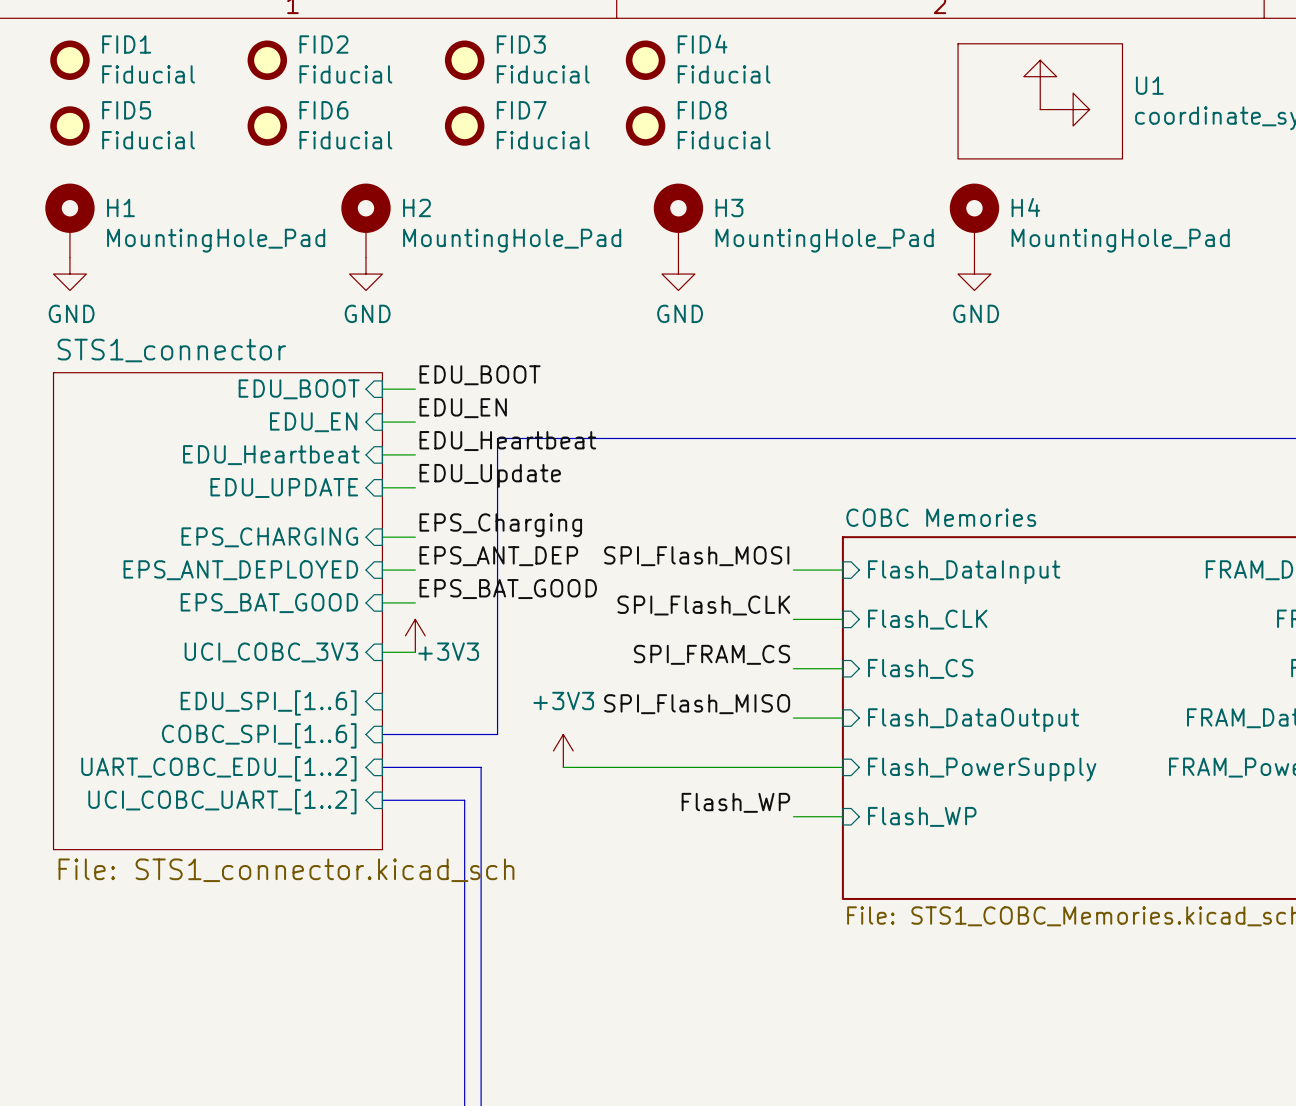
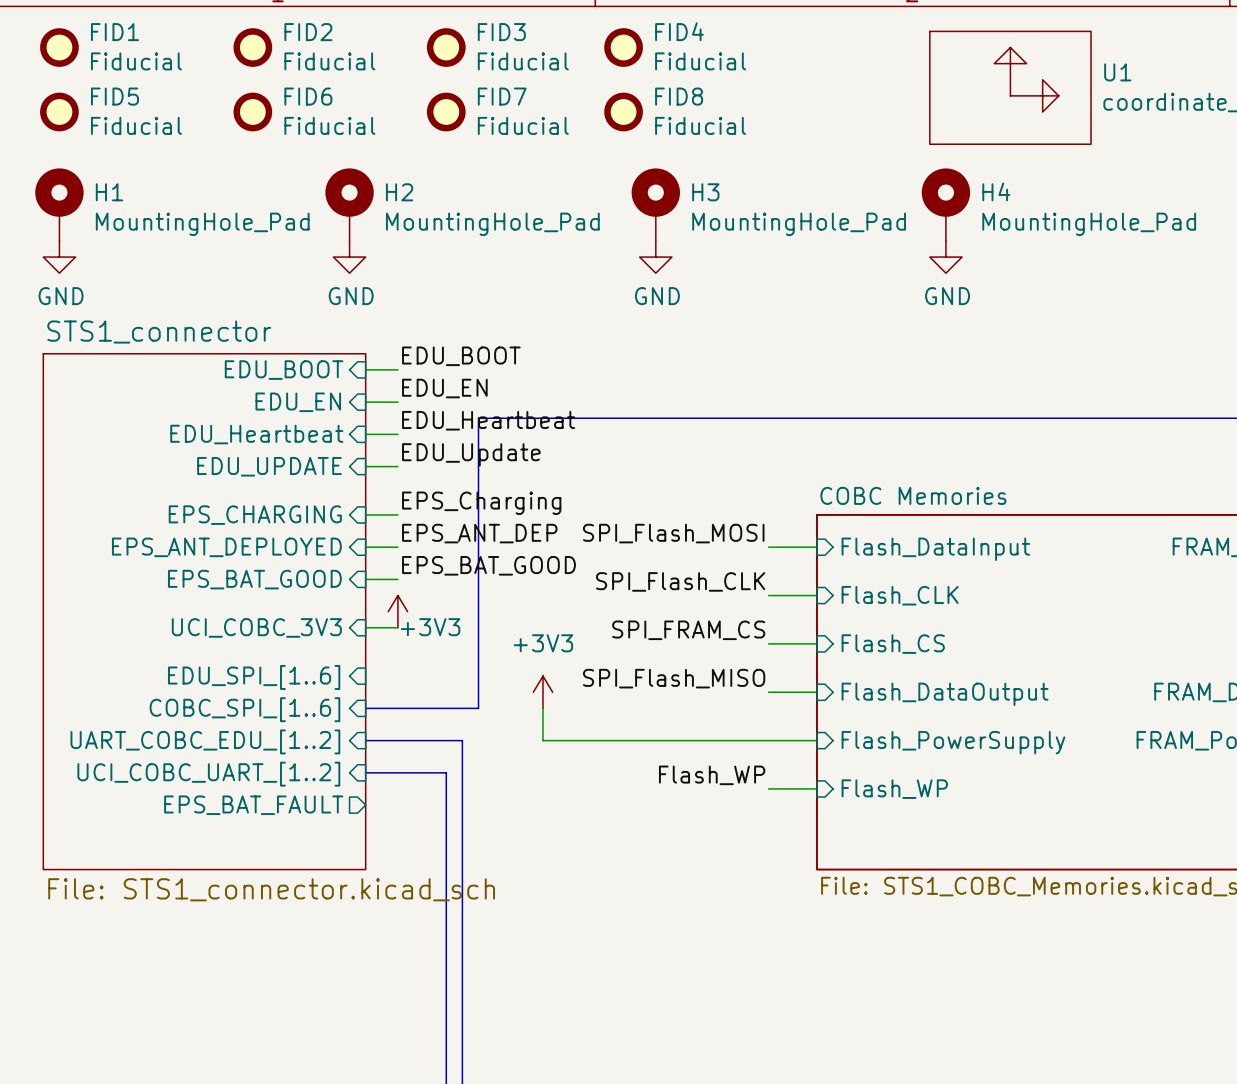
sheet STS1_connector shape: [53, 372, 383, 850] -> [43, 353, 366, 870]
power symbol position: +3V3 (563, 750) -> +3V3 (542, 692)
sheet pin: none -> EPS_BAT_FAULT (253, 805)

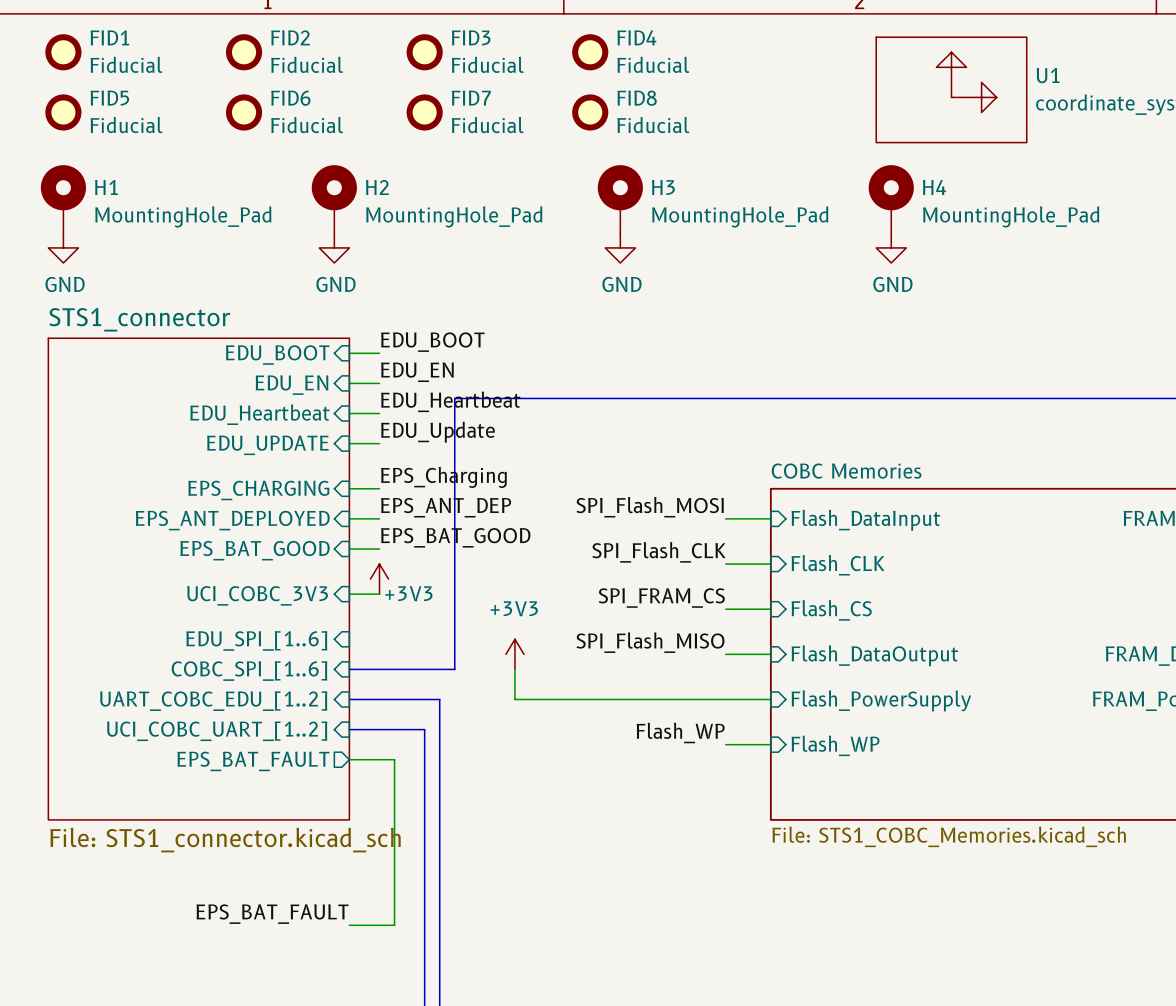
wire: none -> (349, 759) (394, 759) (394, 925) (349, 925)
label: none -> EPS_BAT_FAULT (272, 914)

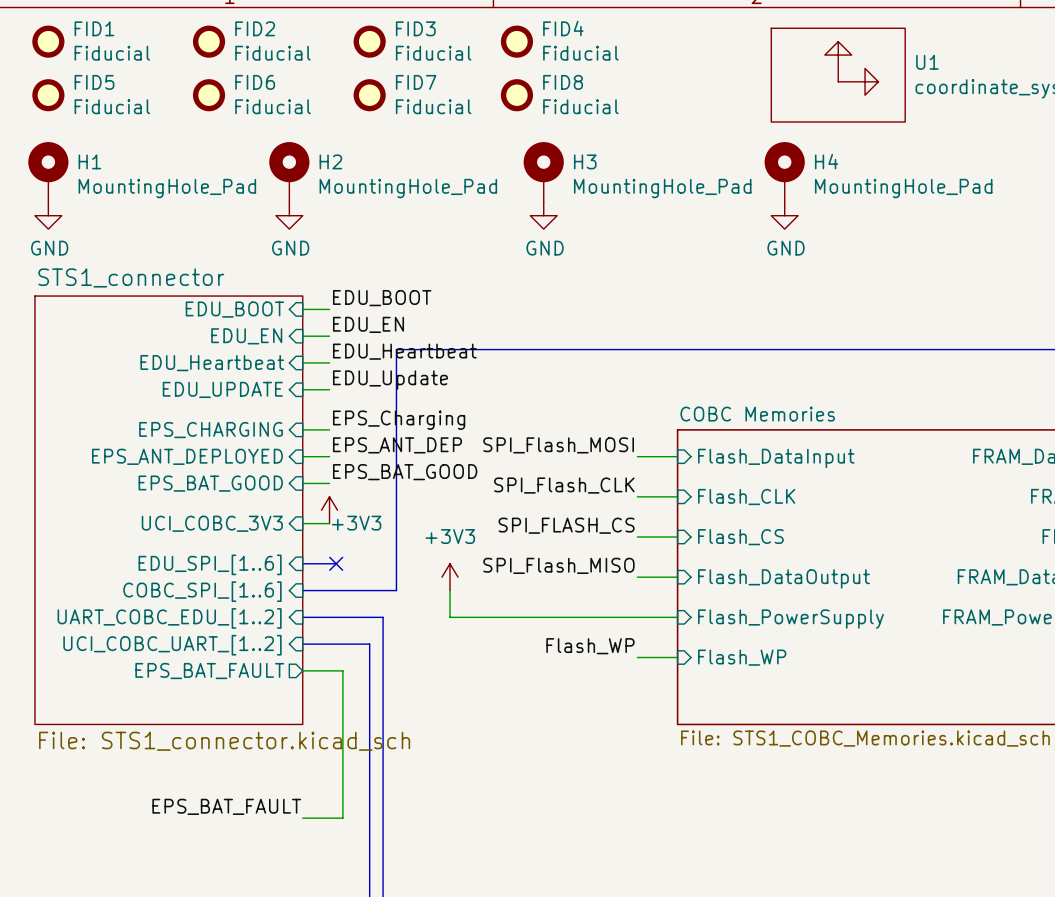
label: SPI_FRAM_CS (661, 598) -> SPI_FLASH_CS (566, 525)
bus: none -> (302, 563) (336, 563)
no-connect mark: none -> (336, 563)

